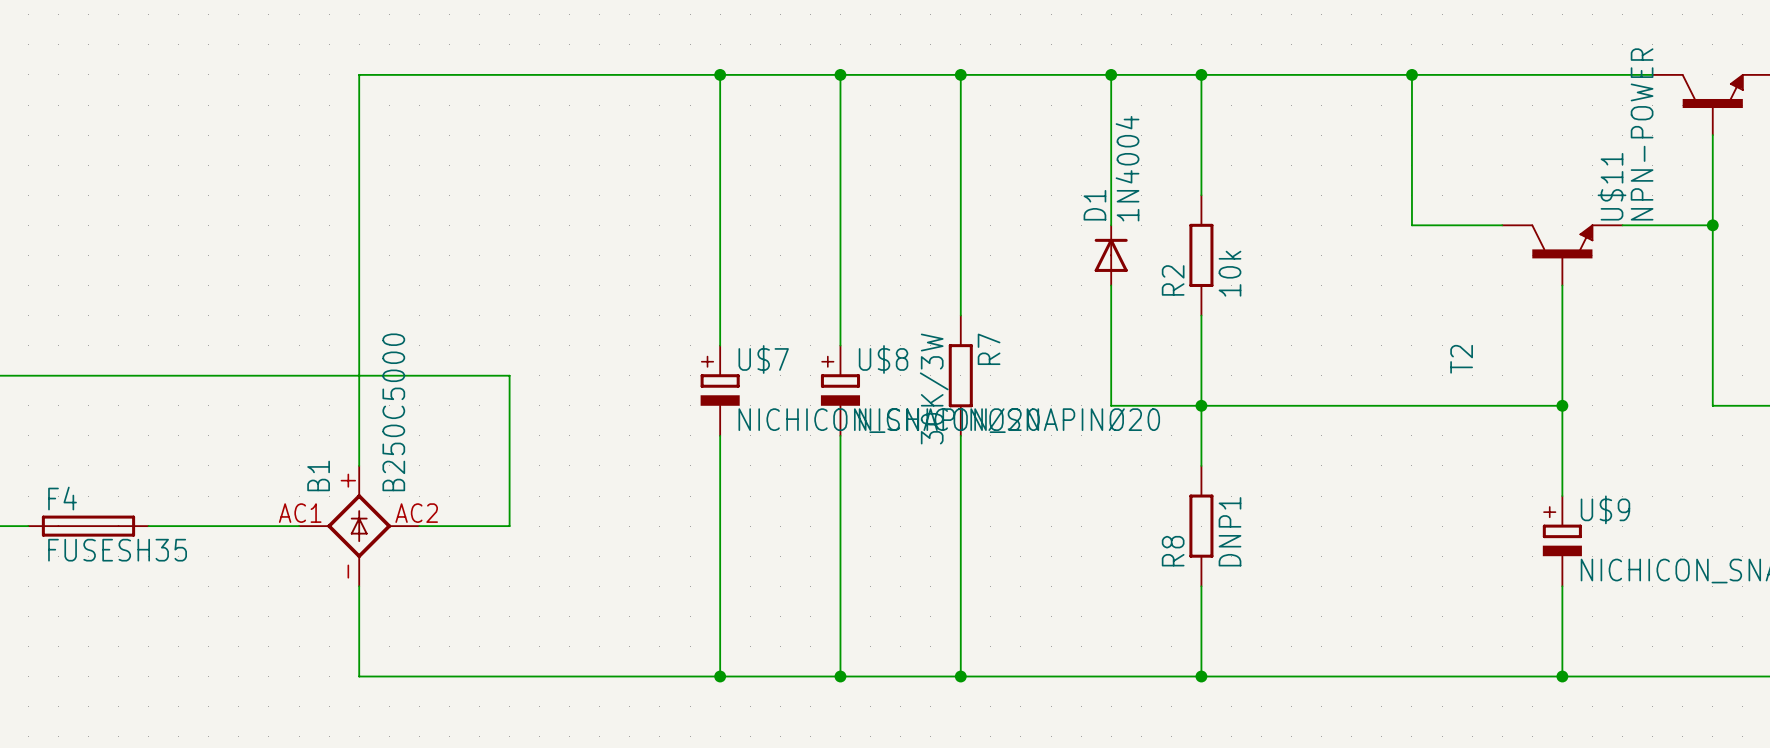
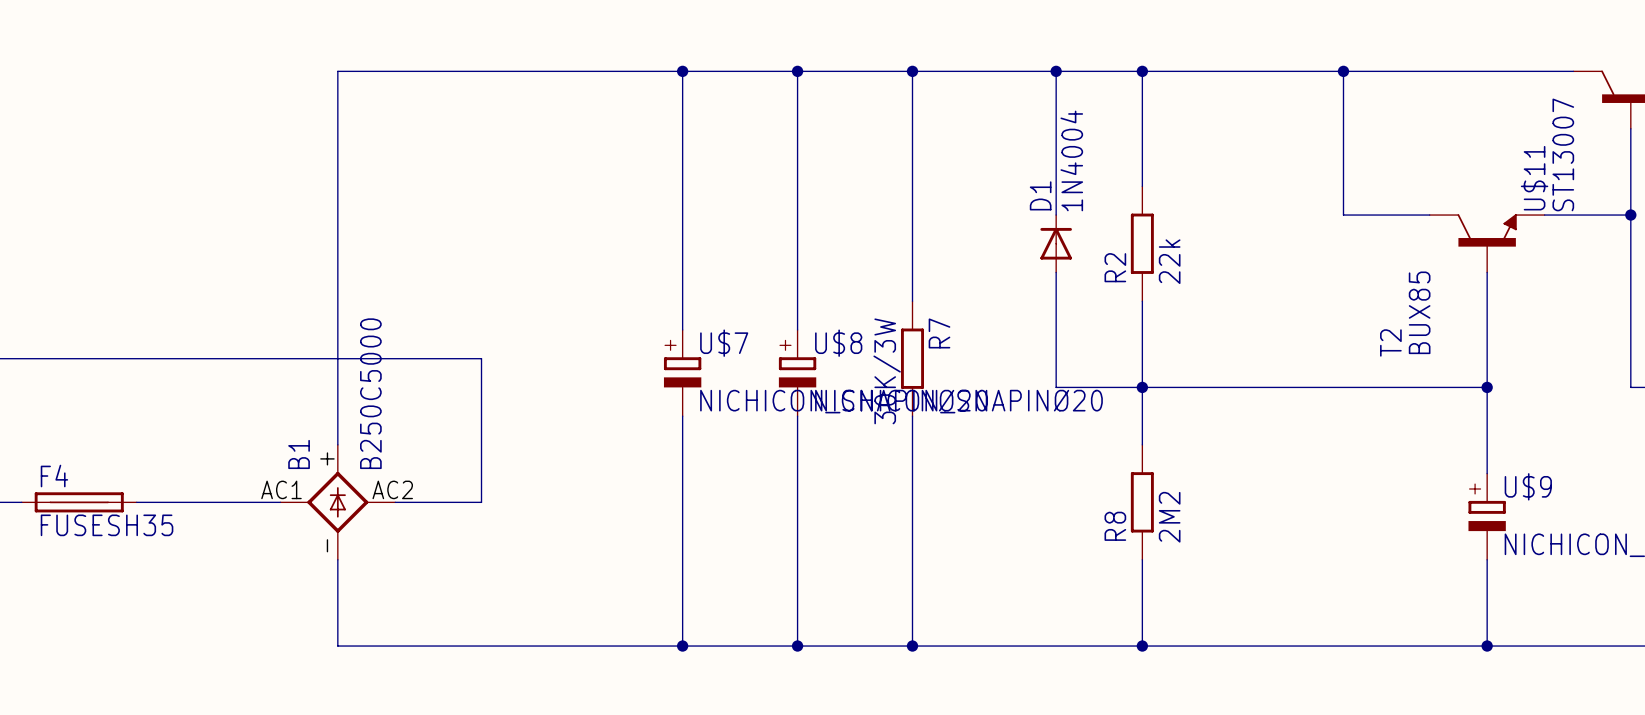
U$11 value: NPN-POWER (1642, 134) -> ST13007 (1563, 154)
R2 value: 10k (1230, 273) -> 22k (1169, 261)
T2 value: none -> BUX85 (1419, 312)
R8 value: DNP1 (1230, 531) -> 2M2 (1169, 517)

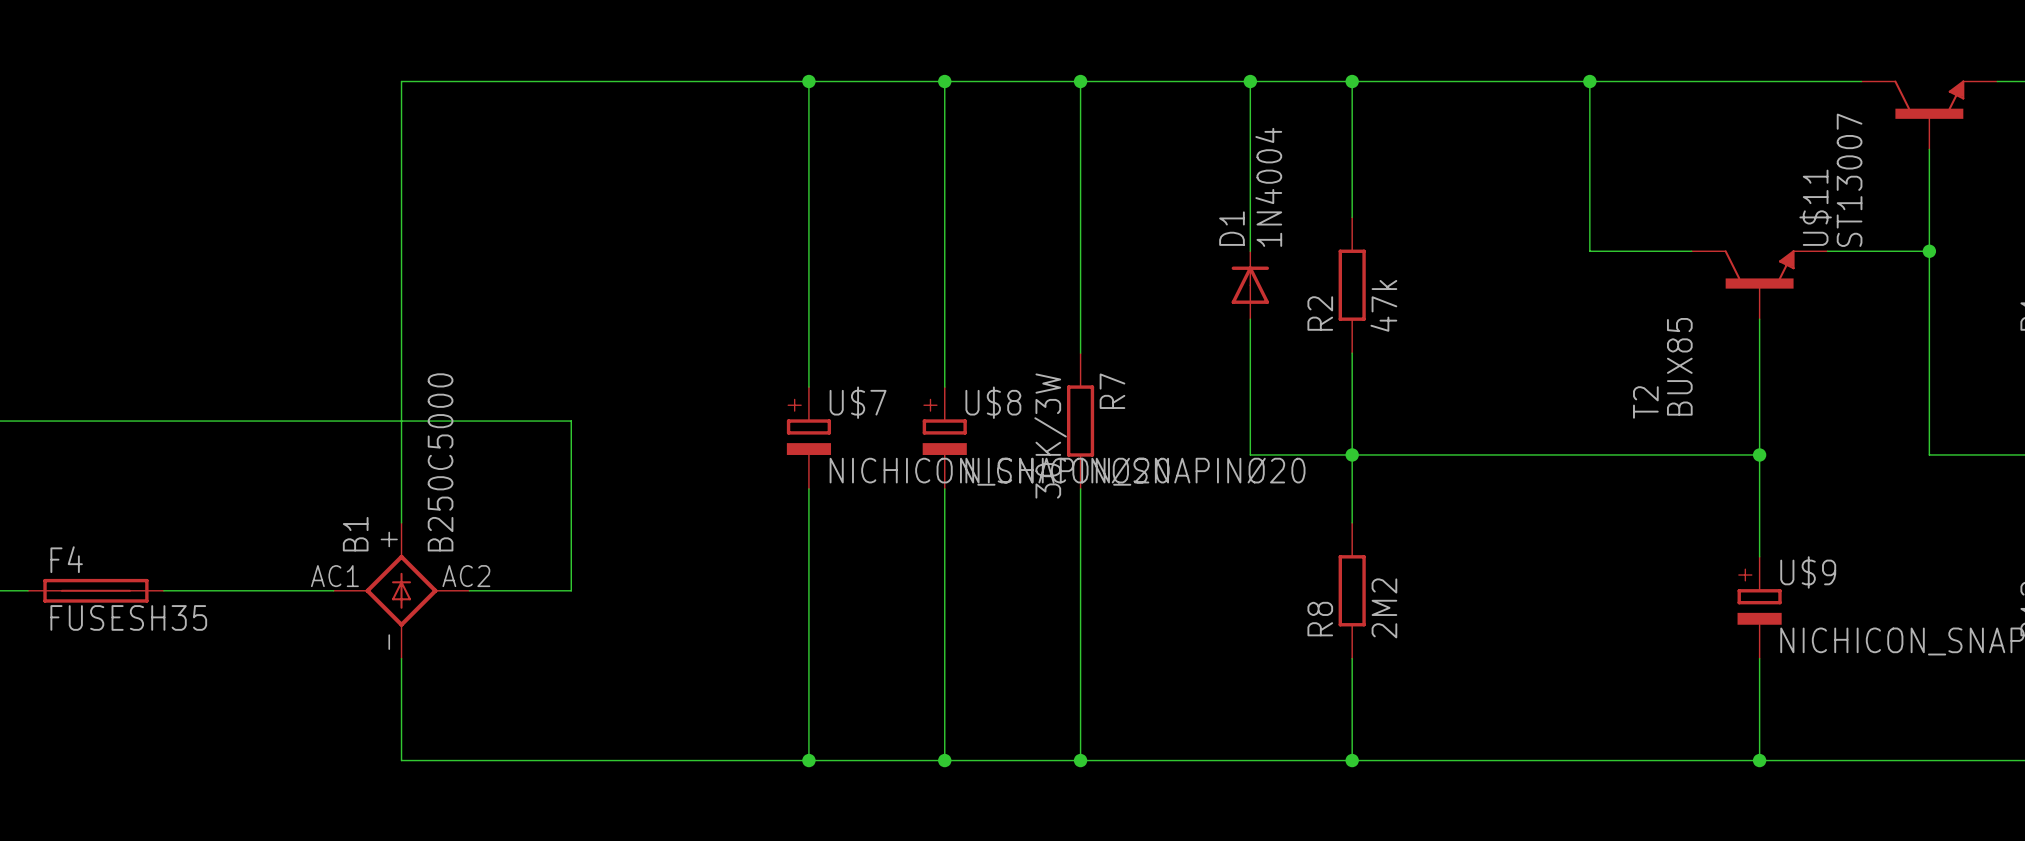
R2 value: 22k (1169, 261) -> 47k (1383, 305)

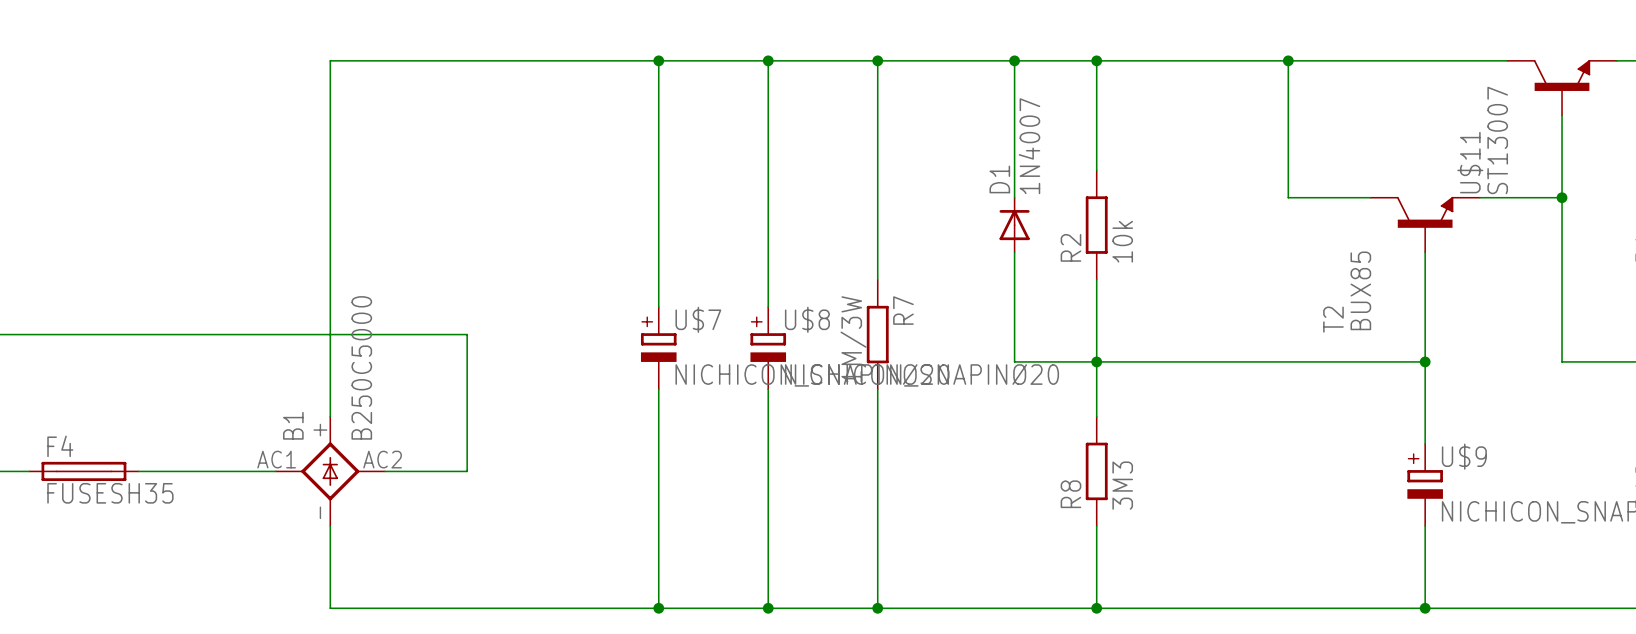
D1 value: 1N4004 (1268, 187) -> 1N4007 (1029, 146)
R2 value: 47k (1383, 305) -> 10k (1122, 241)
R7 value: 30K/3W (1050, 436) -> 1M/3W (853, 339)
R8 value: 2M2 (1384, 608) -> 3M3 (1122, 485)

